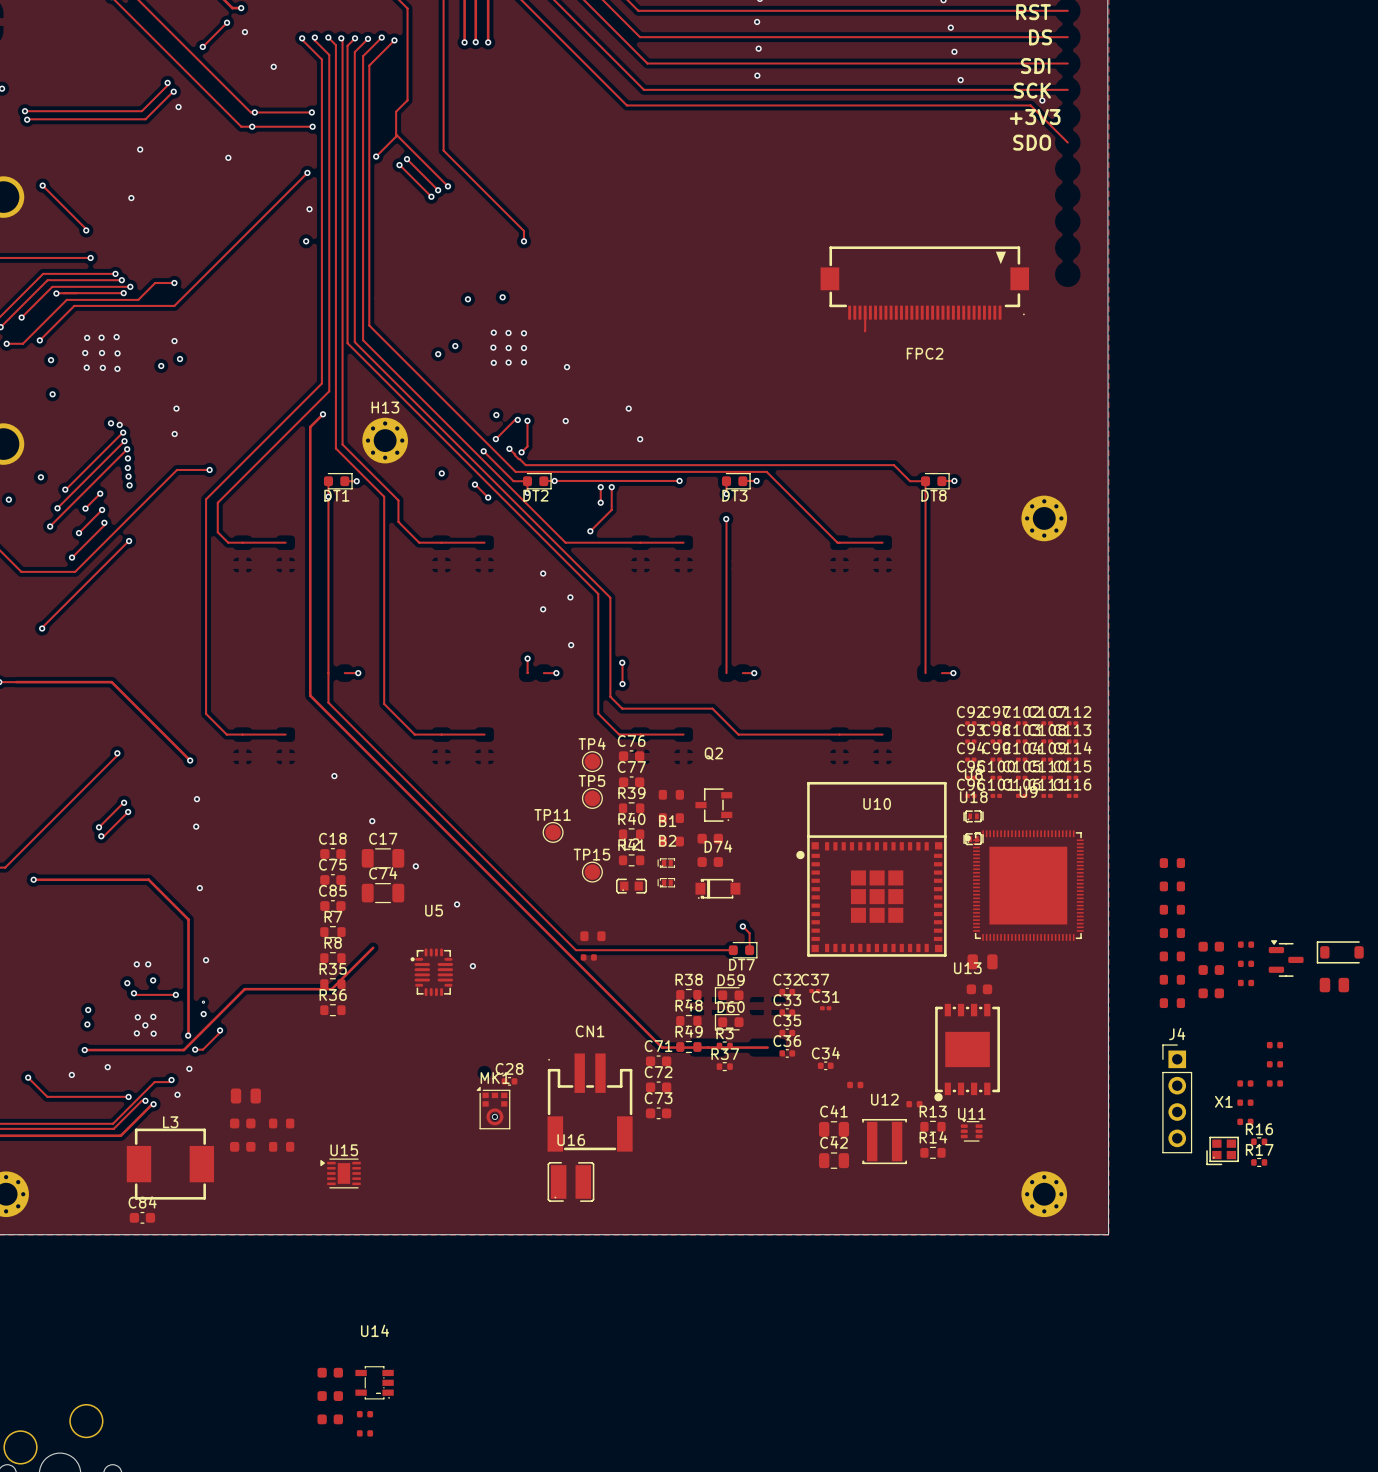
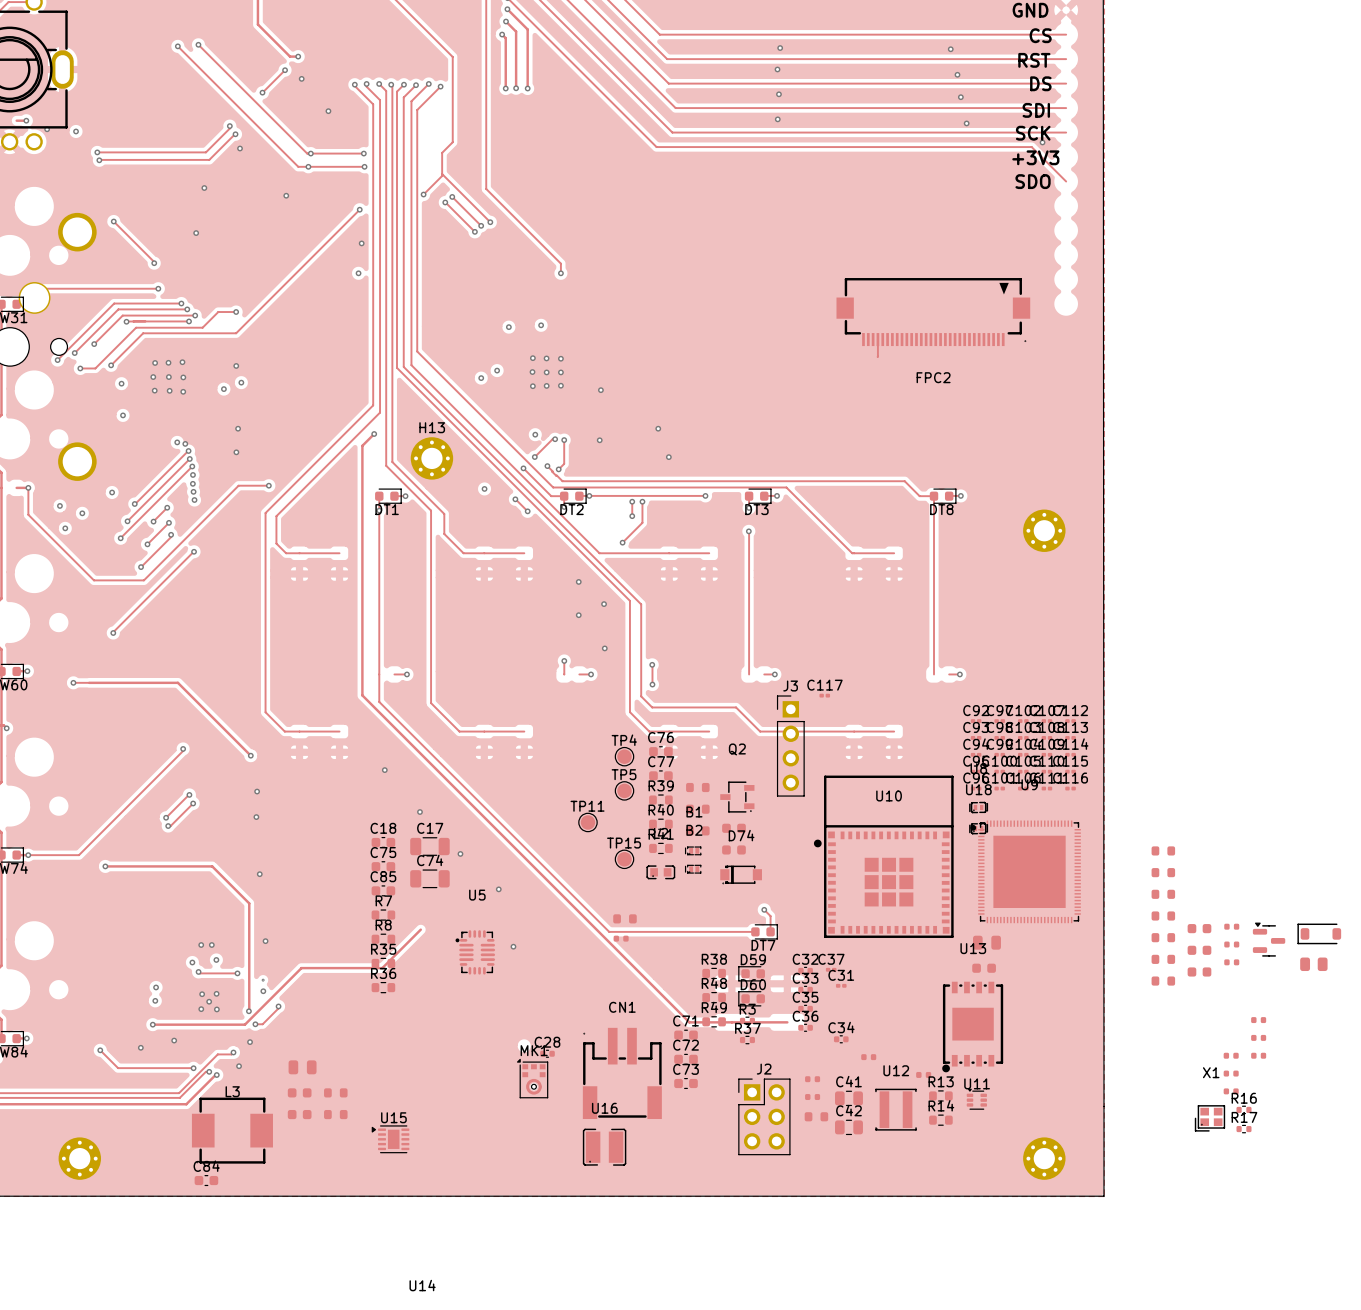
C117: none -> (824, 695)
J3: none -> (790, 746)
J4: (1177, 1098) -> none
part: none -> (812, 1079)
part: none -> (812, 1097)
J2: none -> (764, 1116)
part: none -> (816, 1116)

